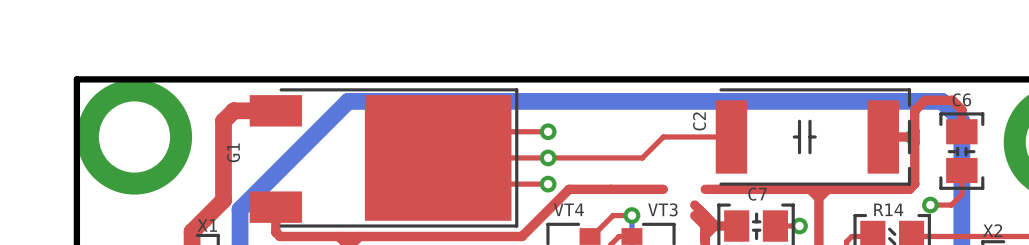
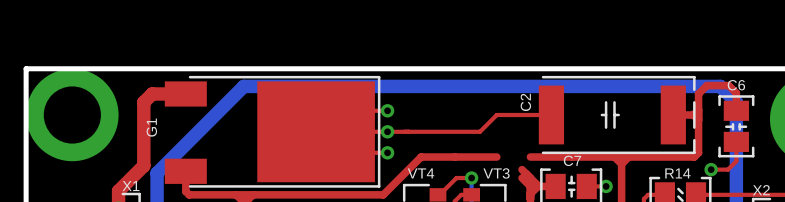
top track: (527, 131) (548, 131) -> none
via: none -> (387, 110)
via: (548, 131) -> none
via: none -> (387, 131)
via: (548, 157) -> none
top track: (527, 184) (548, 184) -> none
via: none -> (387, 152)
via: (548, 184) -> none

